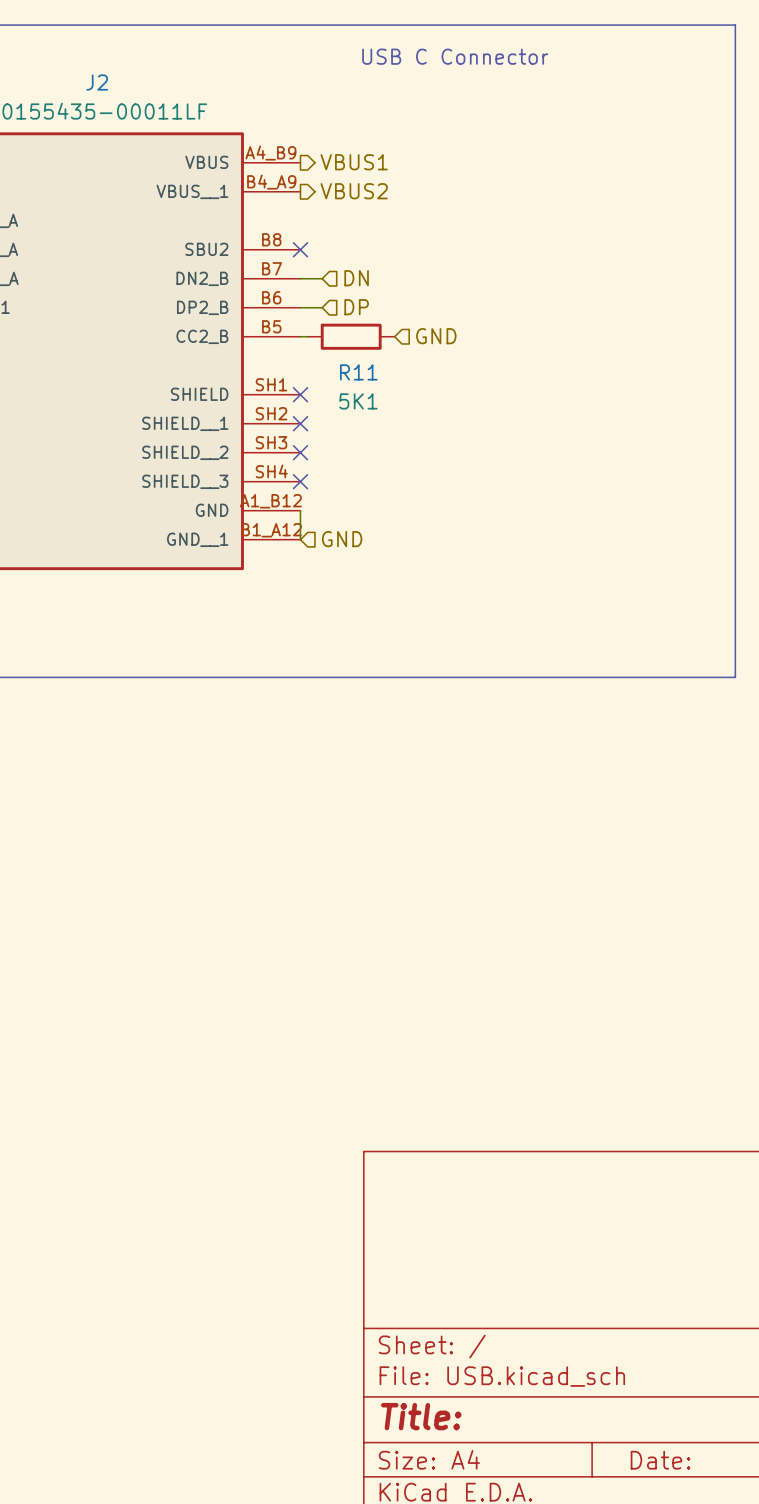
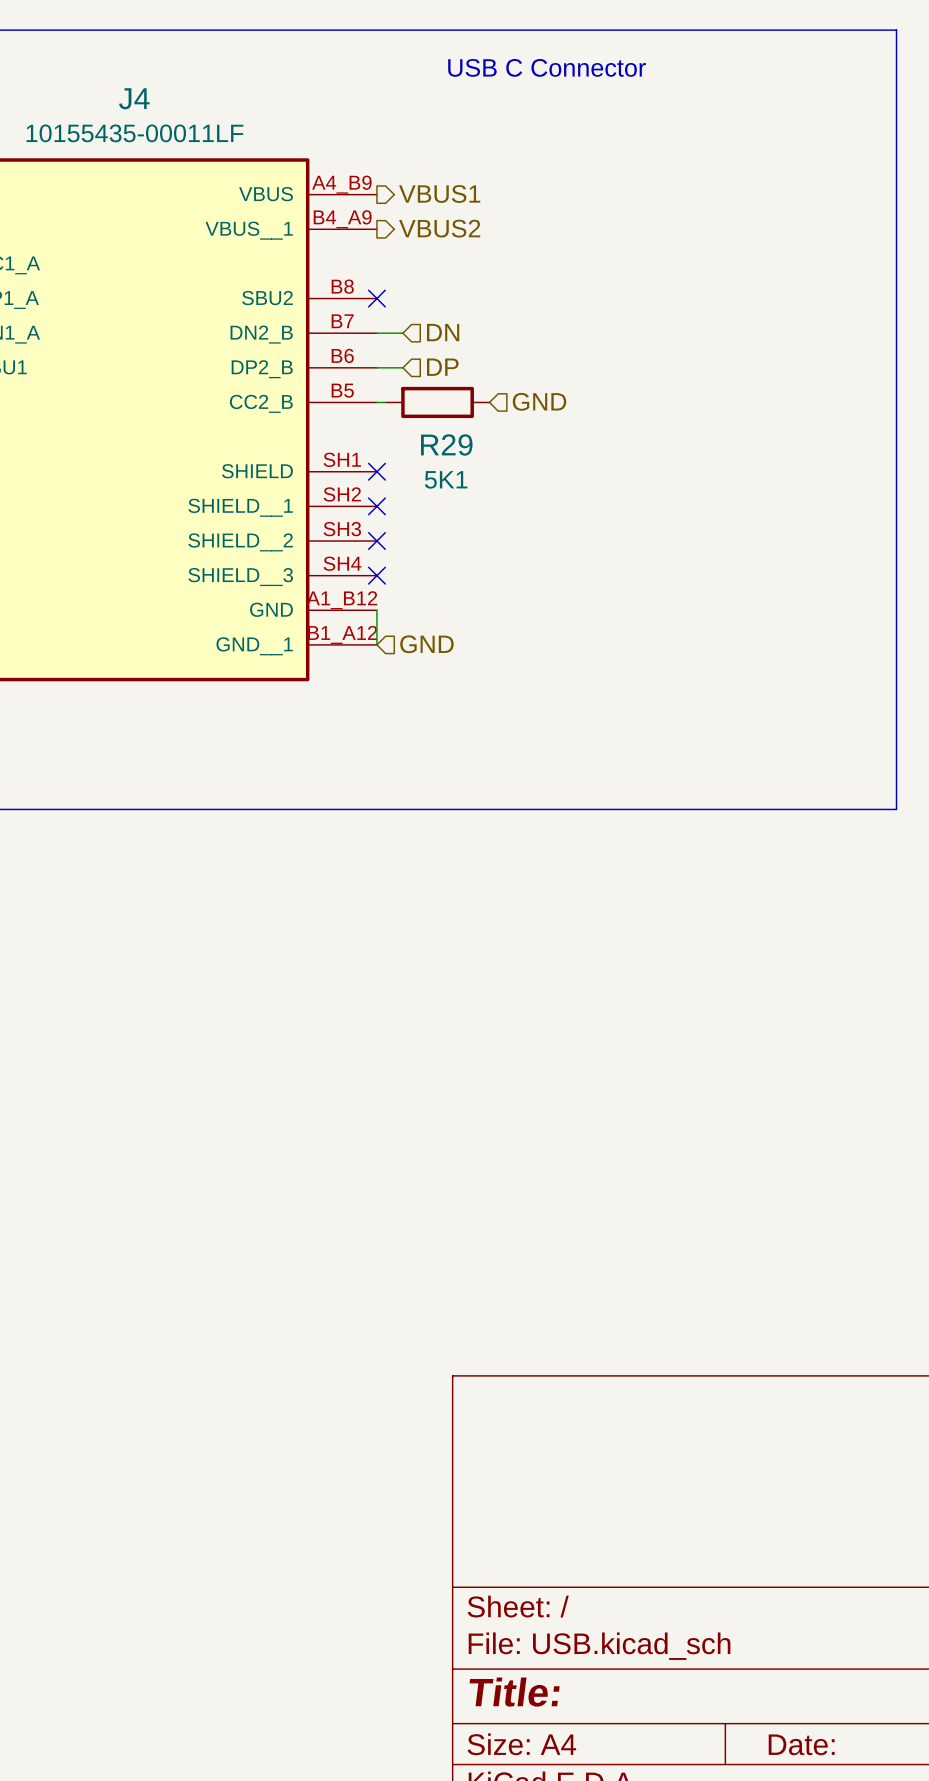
J2 name: J2 (97, 82) -> J4 (134, 98)
R11 name: R11 (358, 372) -> R29 (446, 444)

